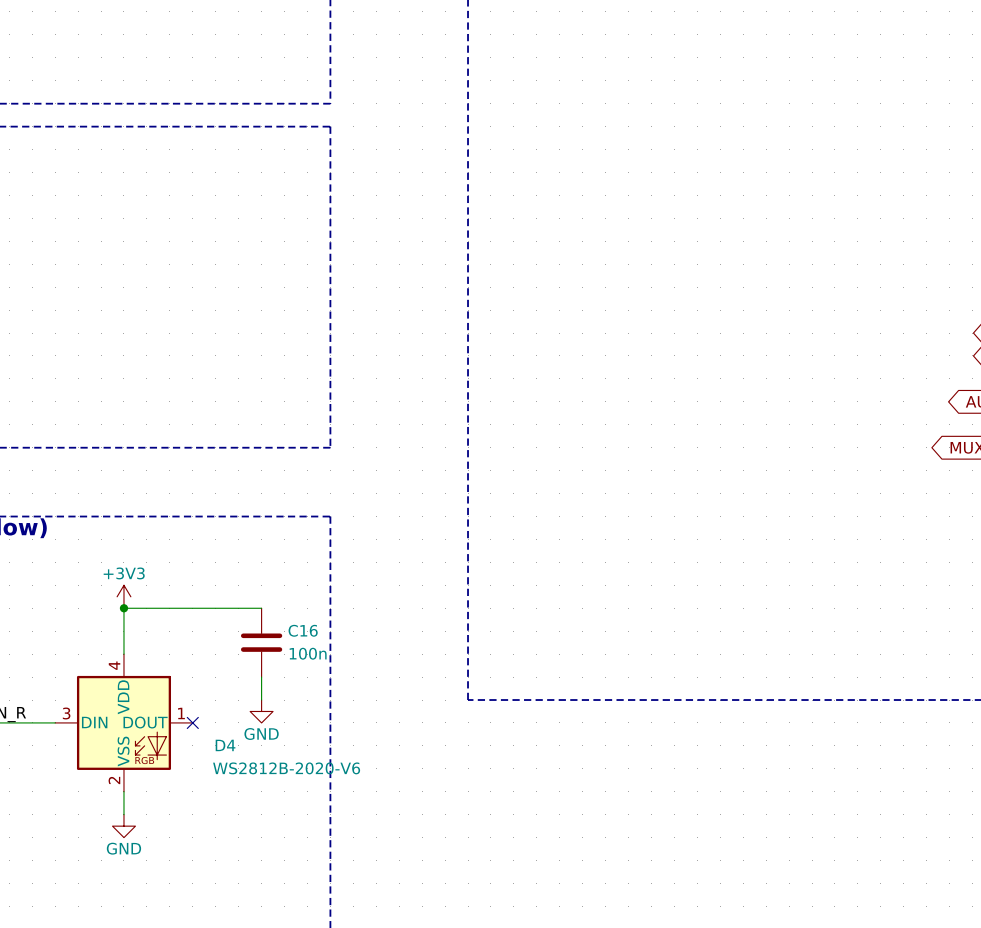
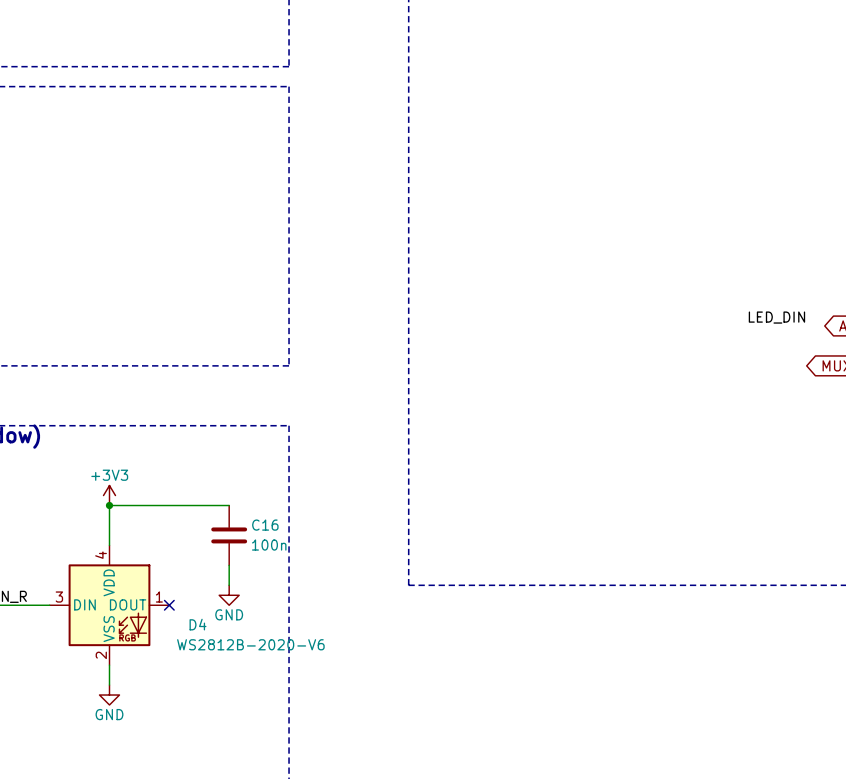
label: none -> LED_DIN (776, 317)

